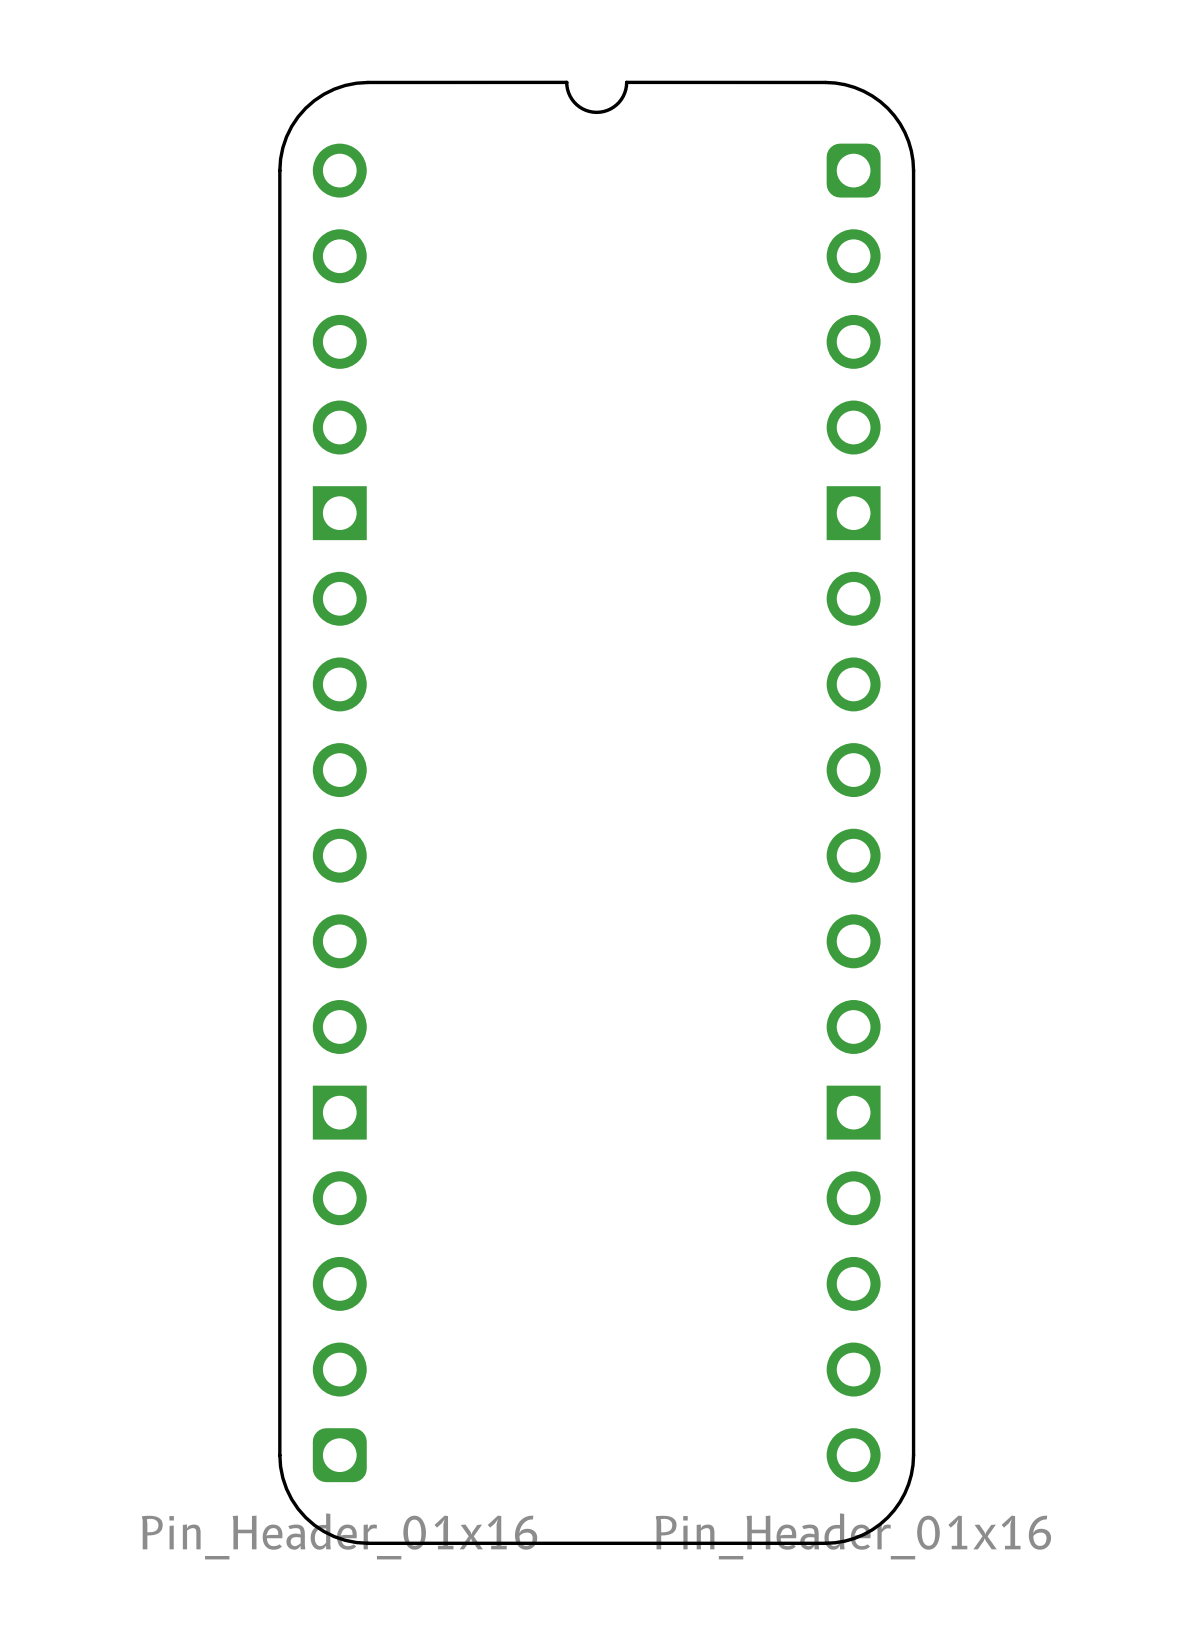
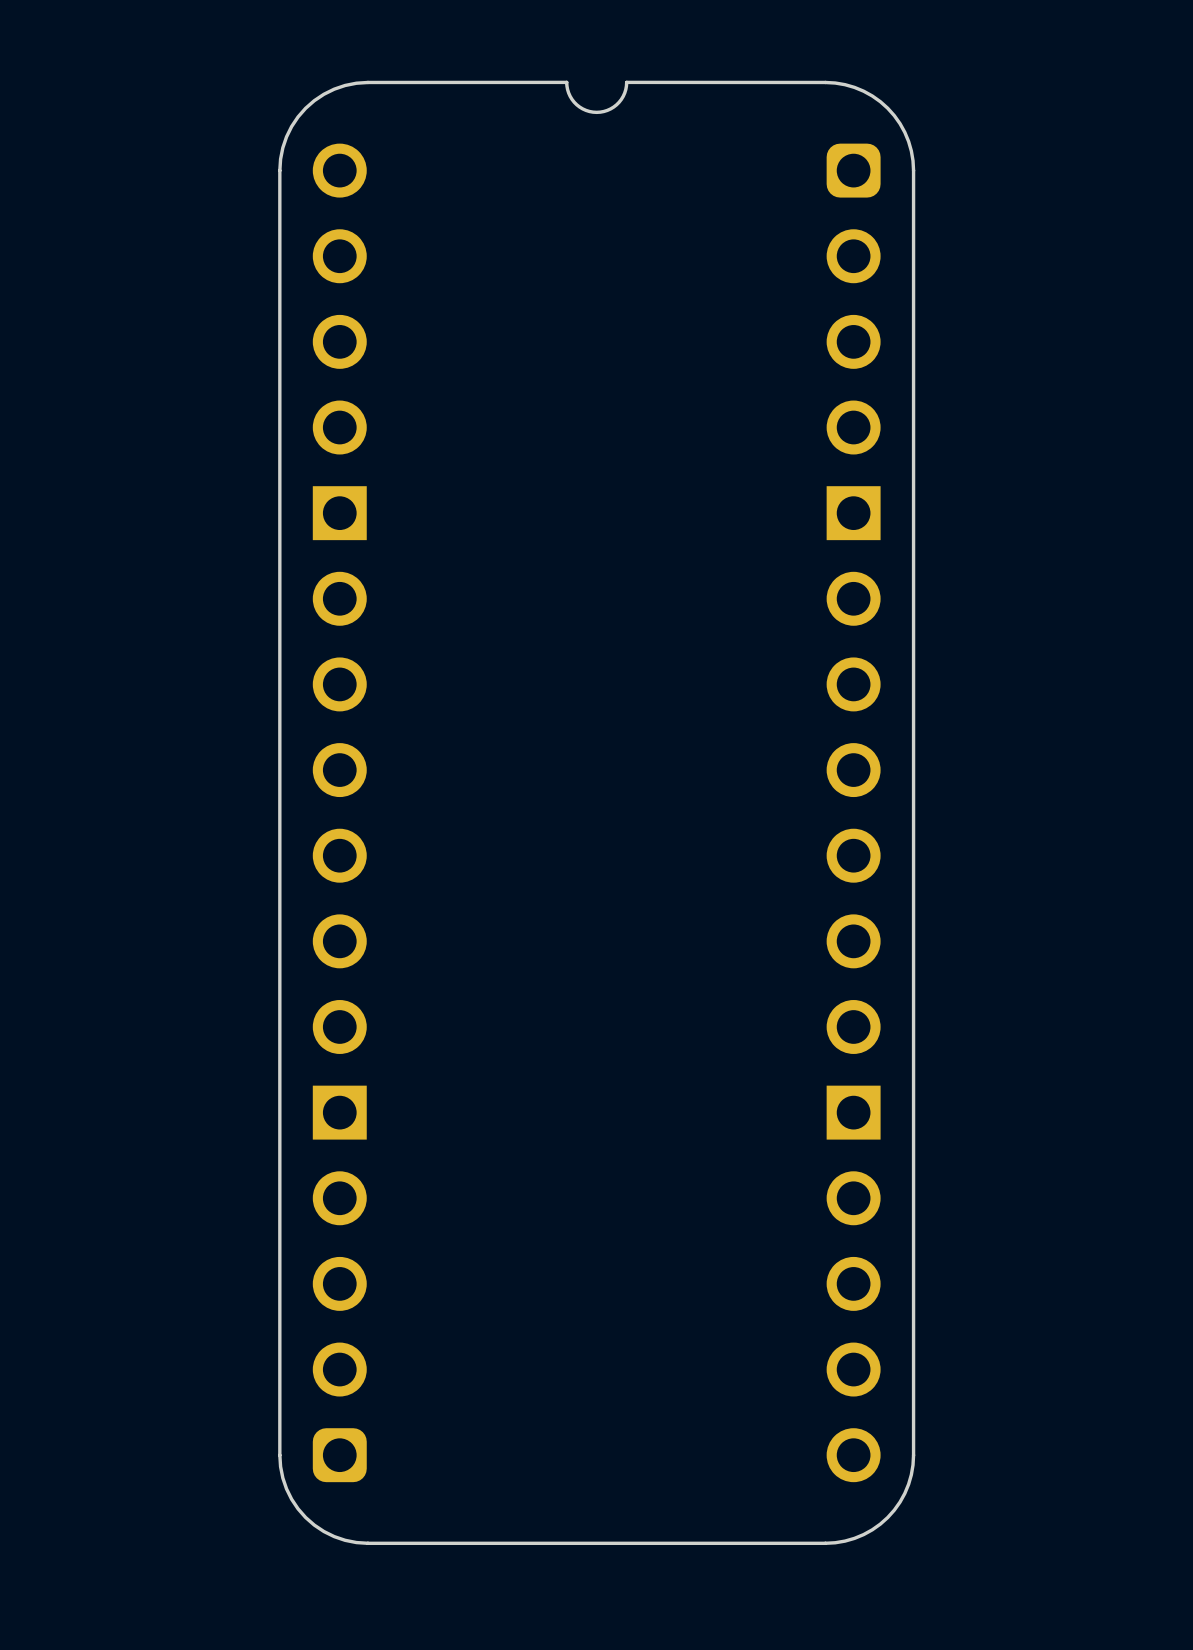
drawing: [141, 1513, 1052, 1560] -> none

